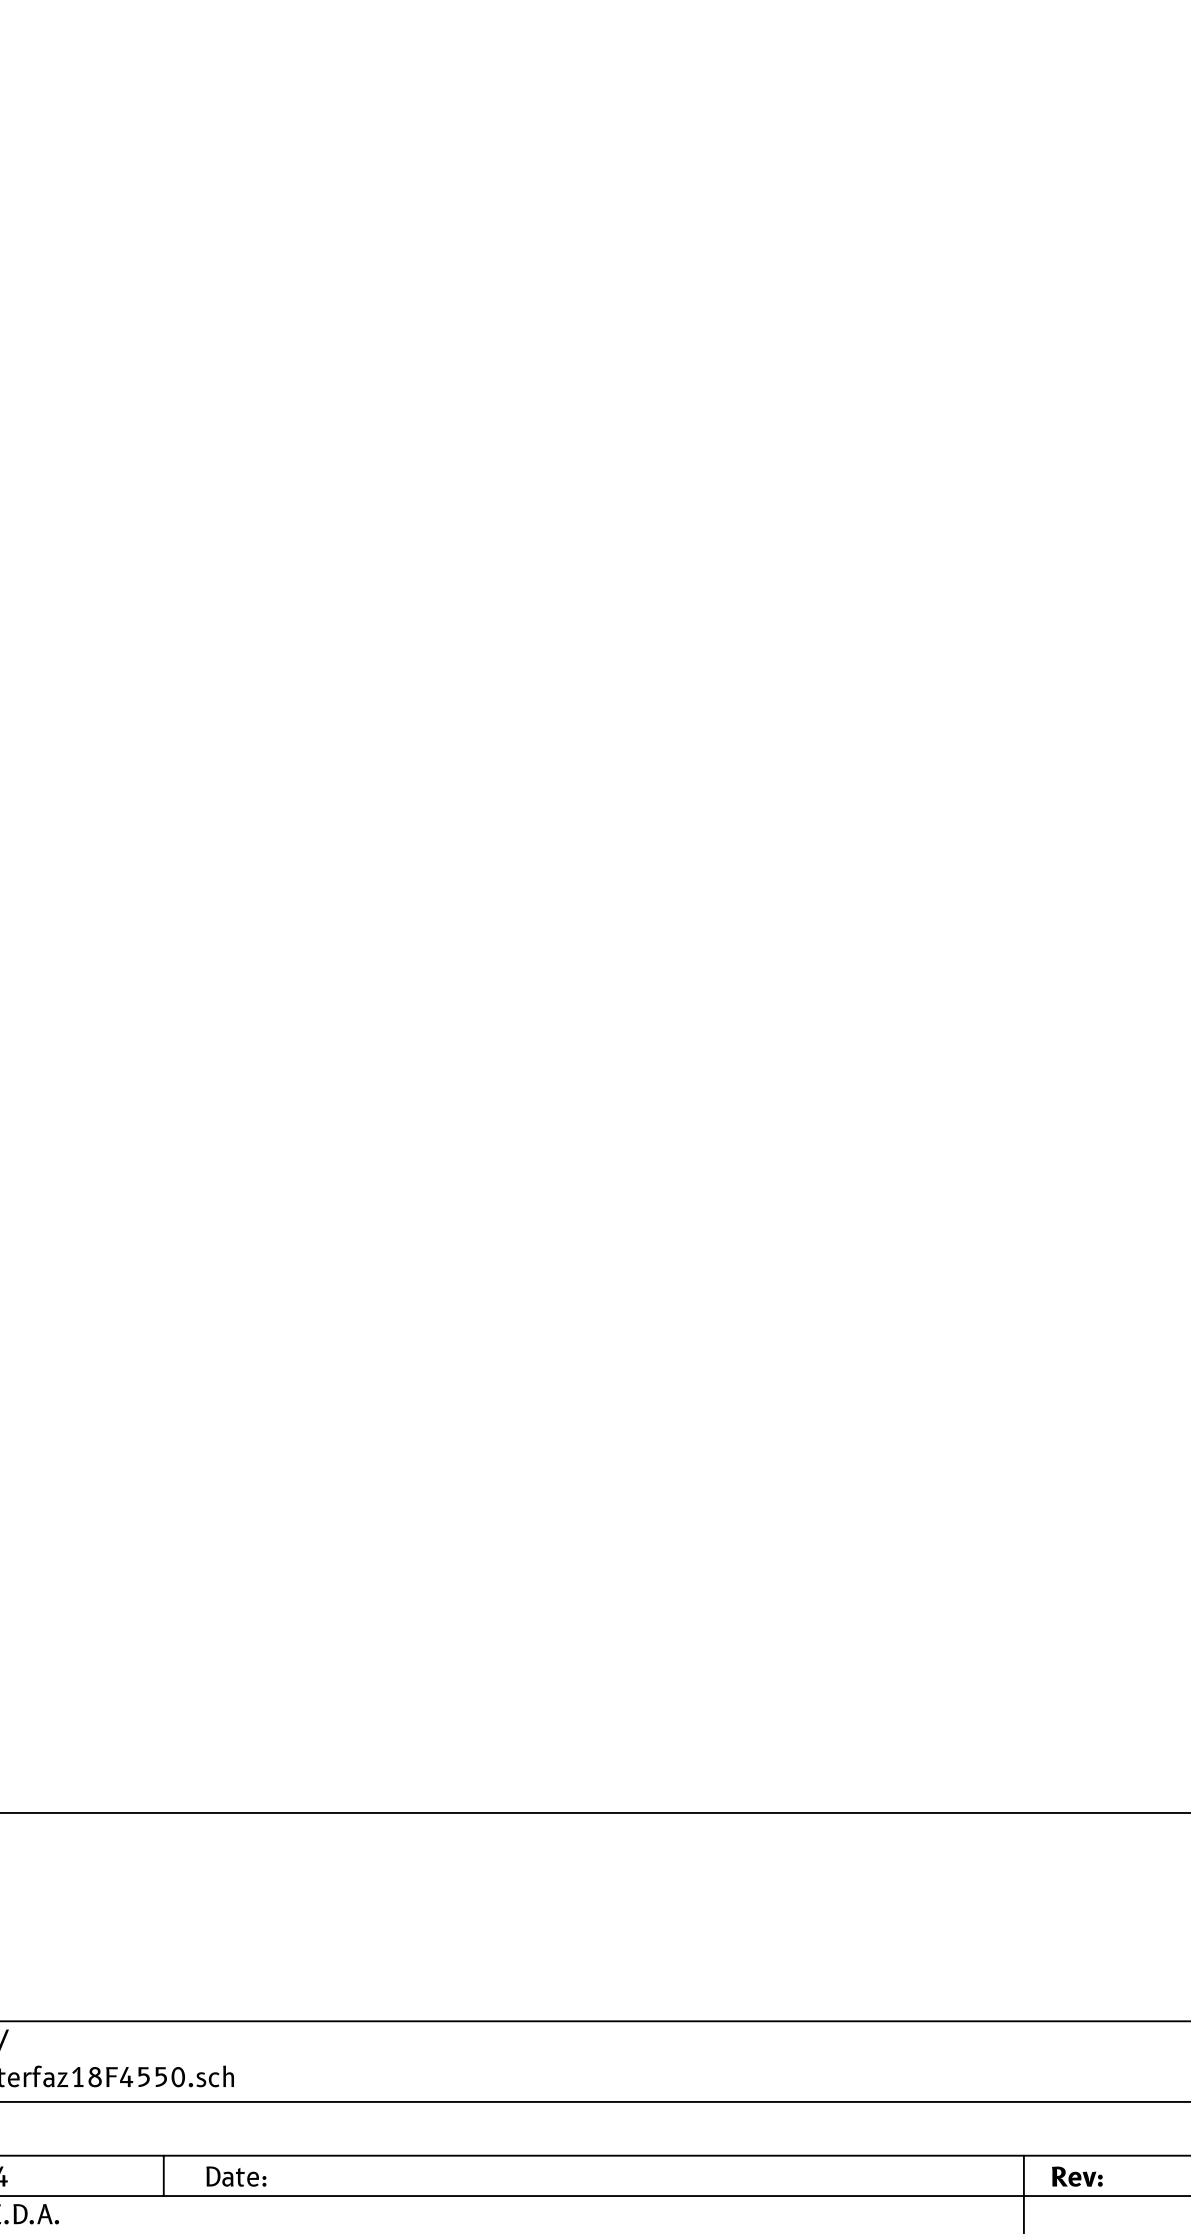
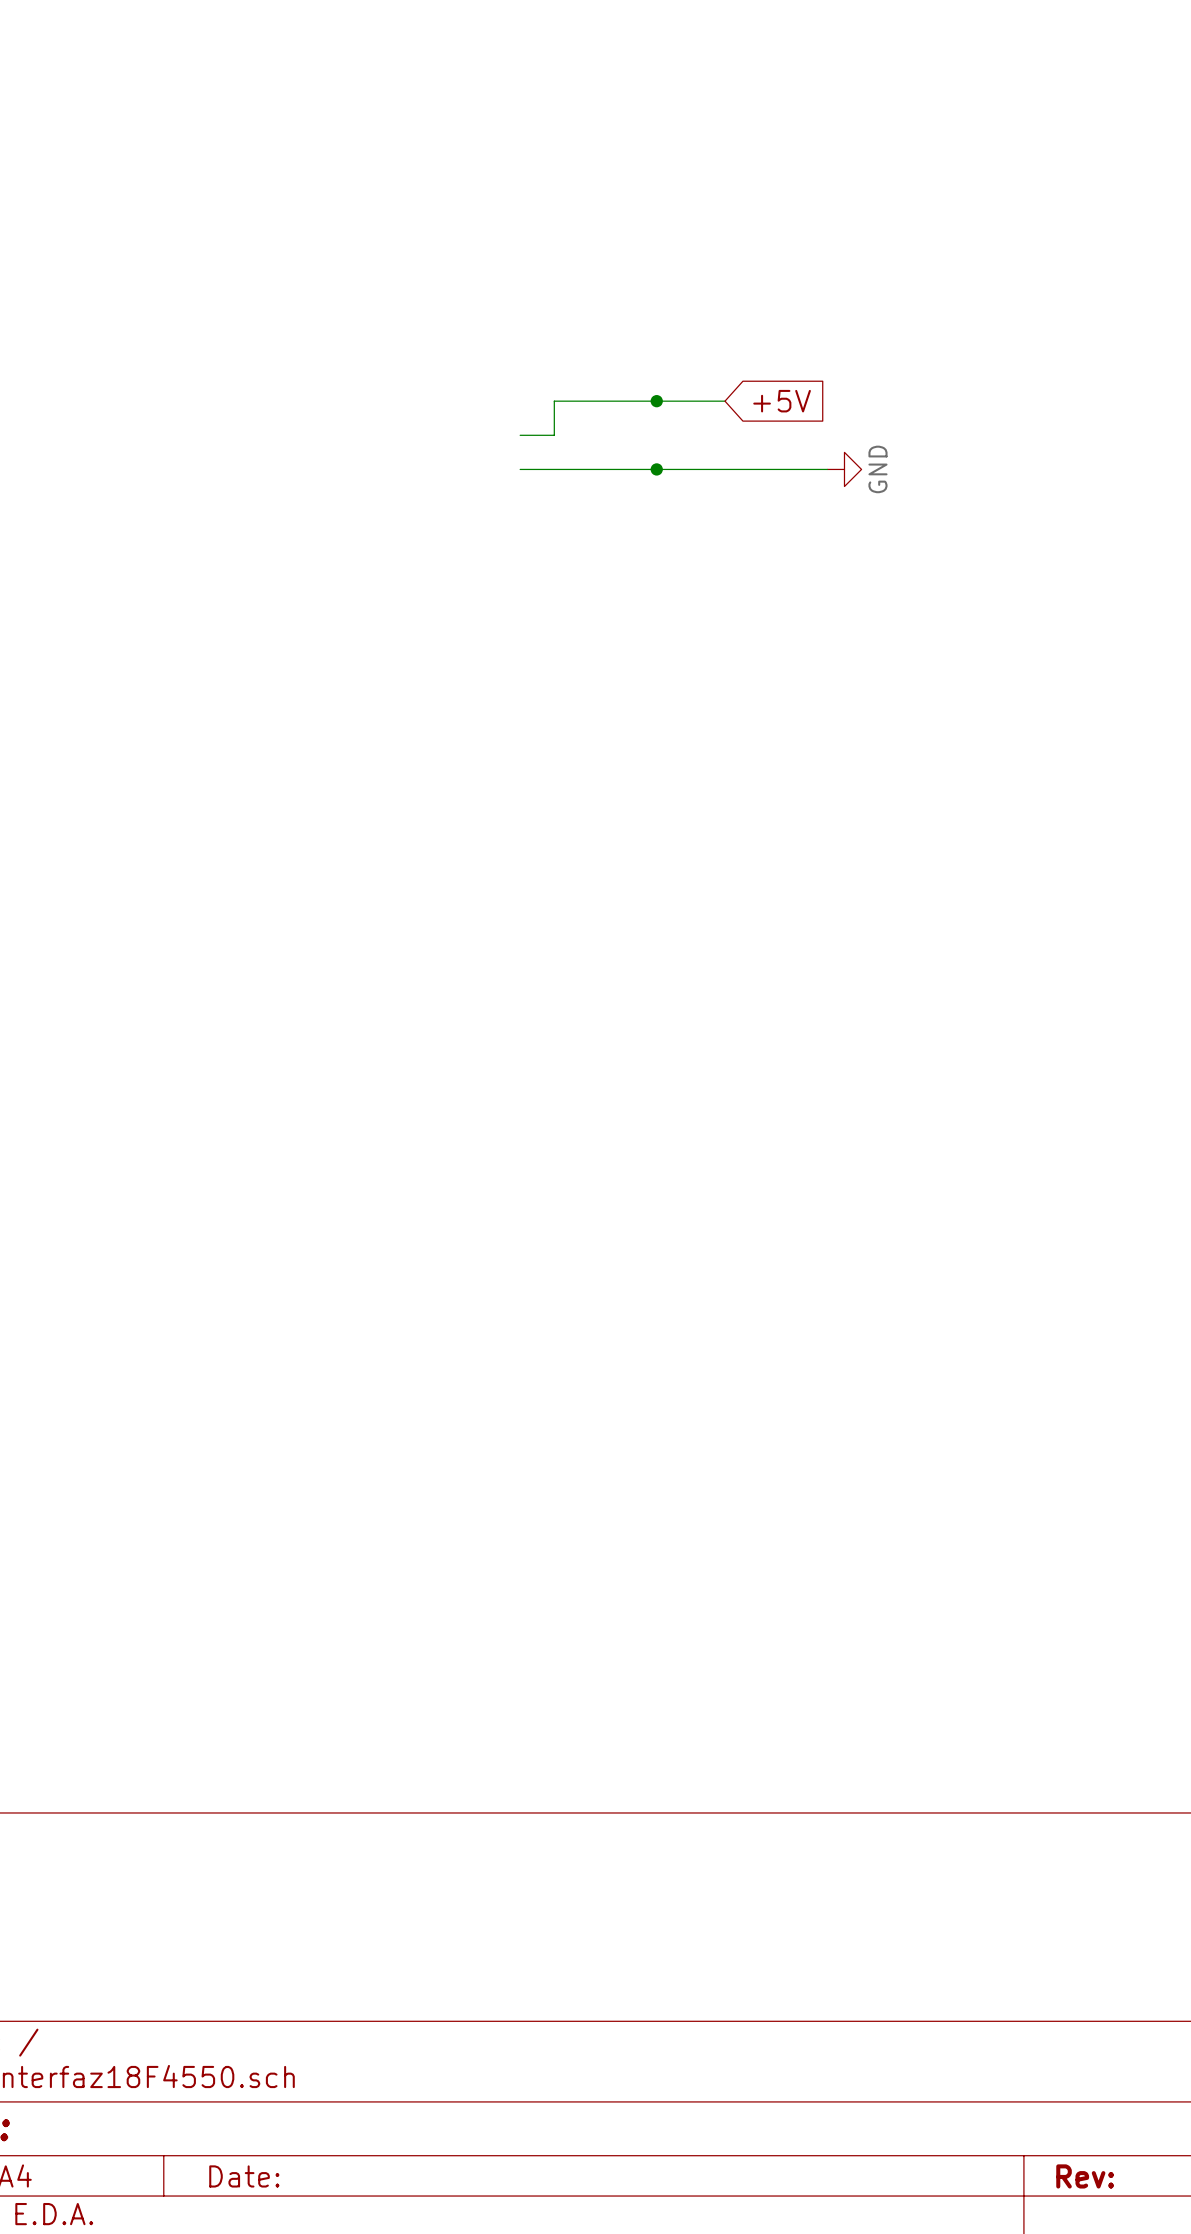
junction: none -> (656, 401)
wire: none -> (725, 401) (554, 401) (554, 435) (520, 435)
global label: none -> +5V (782, 401)
wire: none -> (520, 469) (827, 469)
junction: none -> (656, 469)
power symbol: none -> GND (844, 469)

